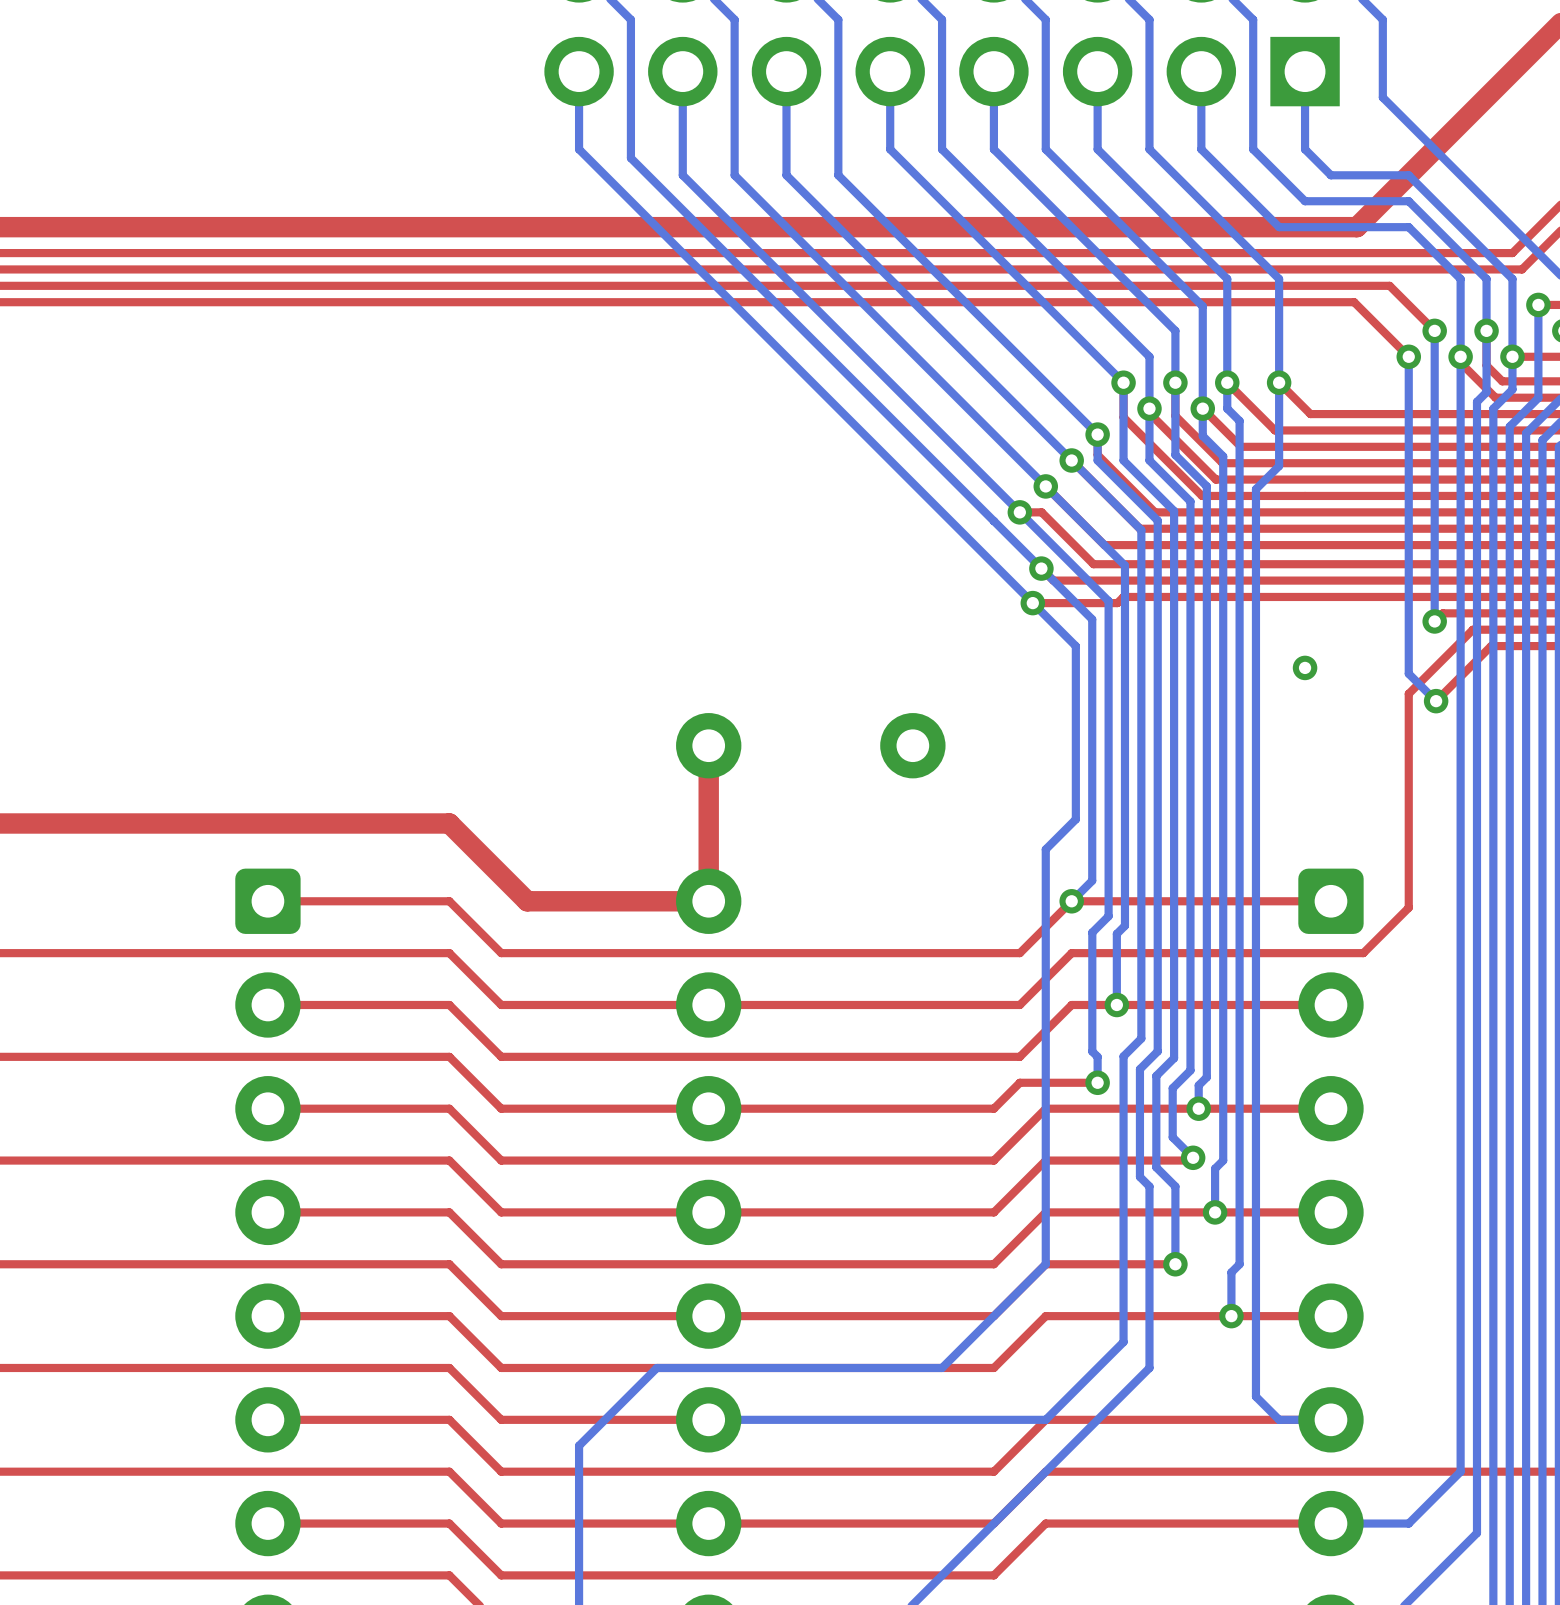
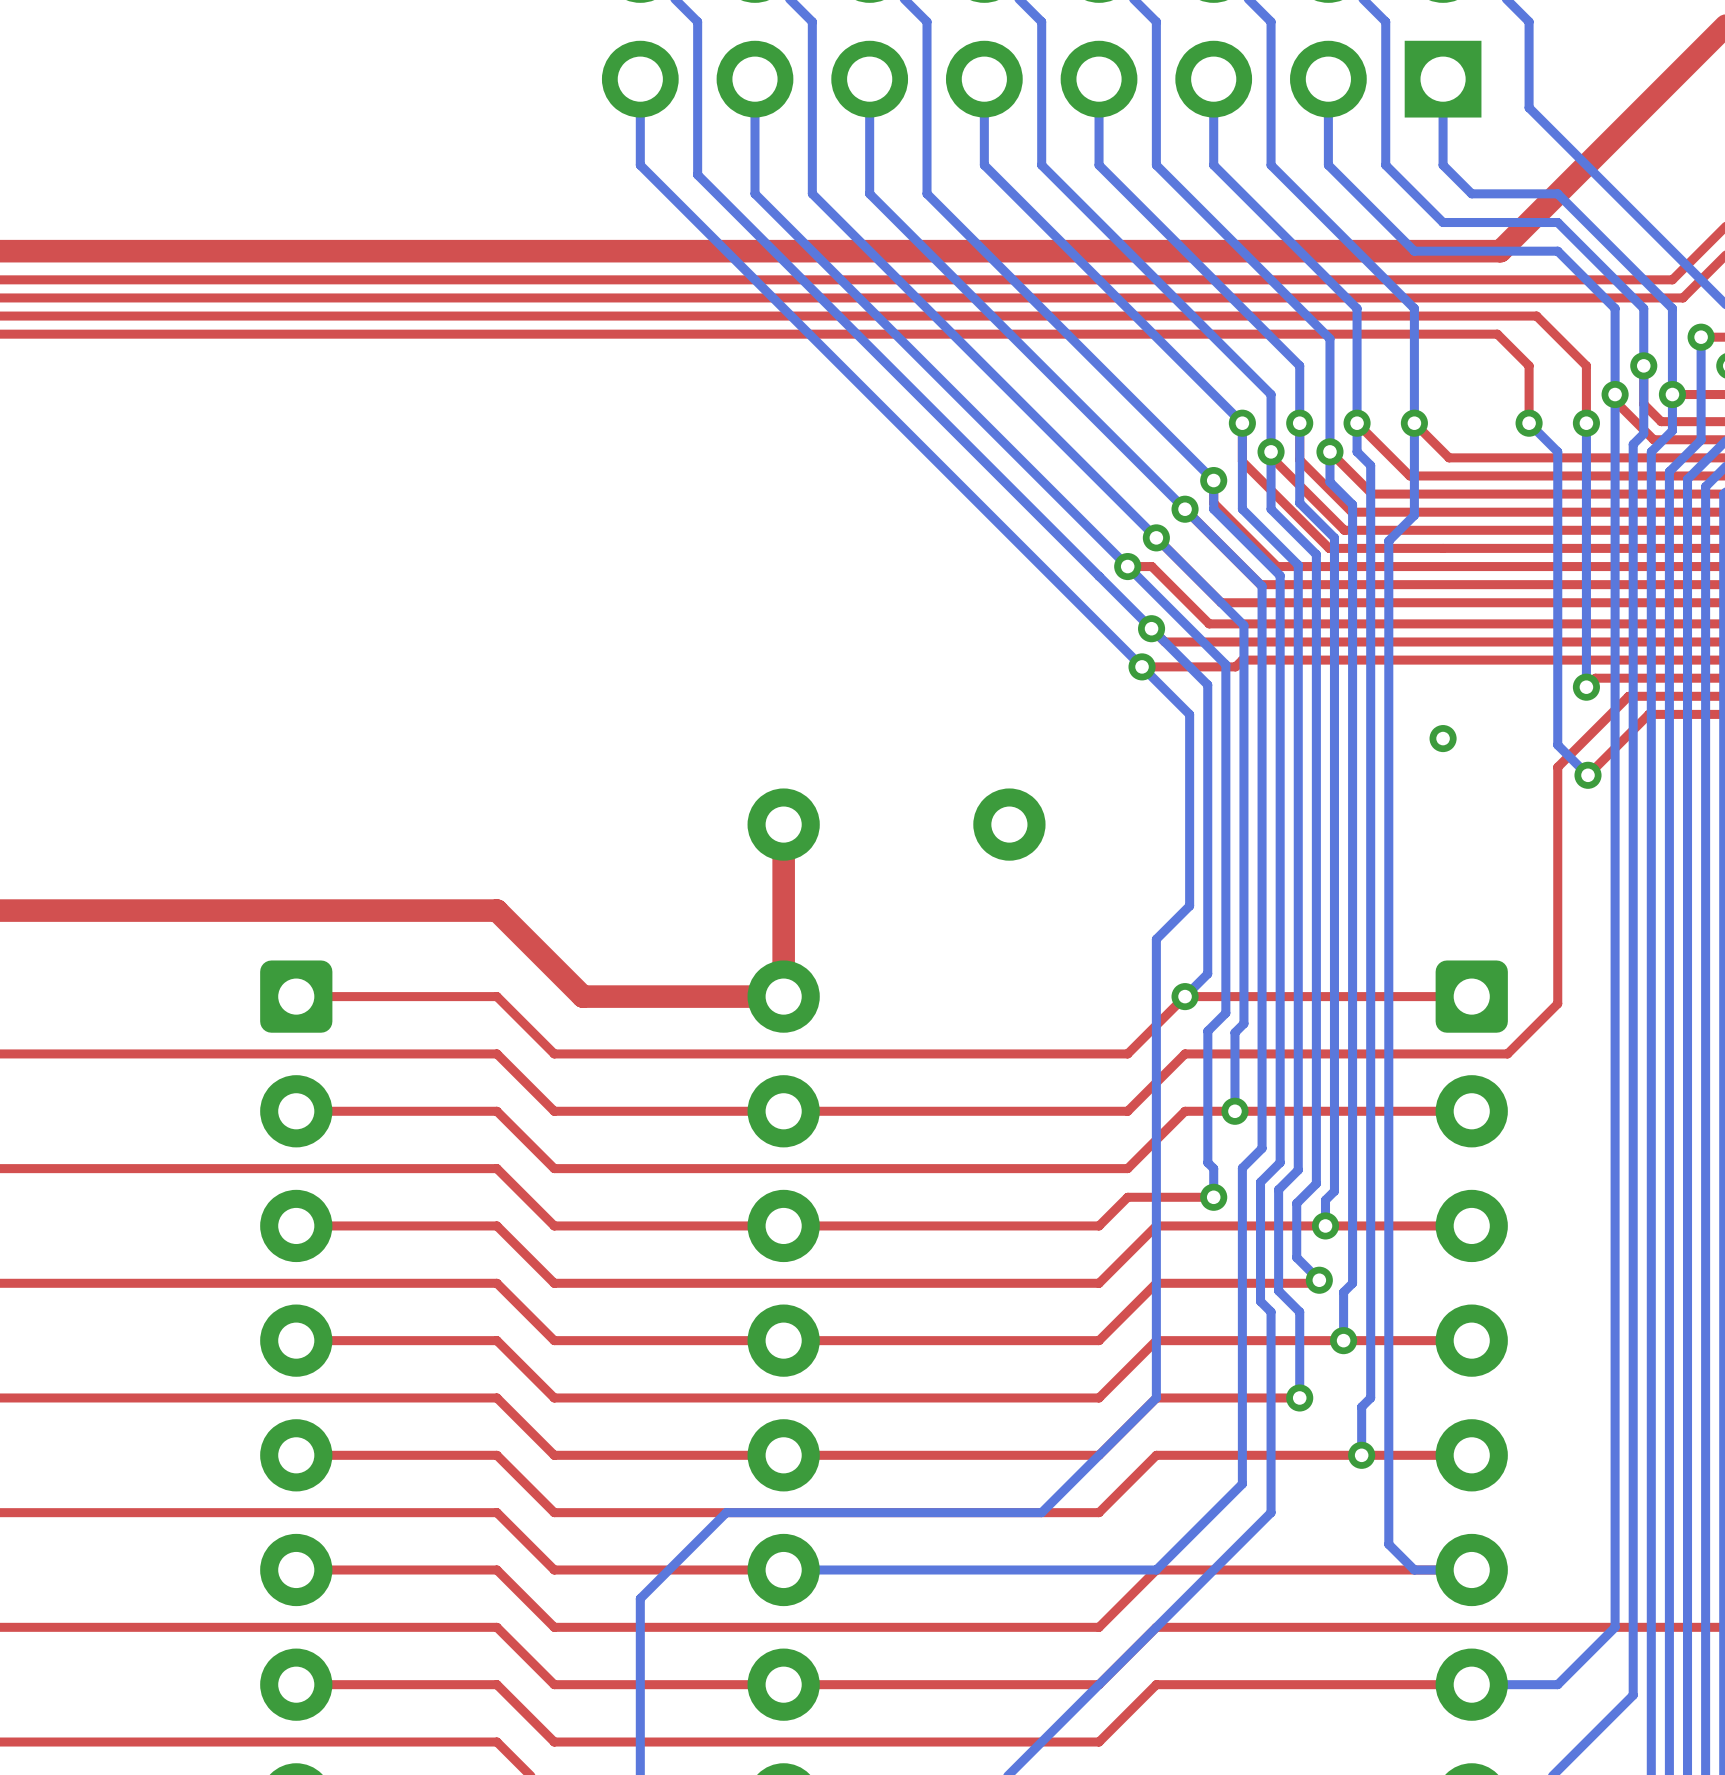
top track: (1382, 330) (1408, 356) -> (1529, 365) (1529, 423)
top track: none -> (1586, 365) (1586, 423)
bottom track: (1434, 330) (1434, 382) -> none
via: (1434, 330) -> none
bottom track: (1408, 356) (1408, 408) -> (1529, 423) (1557, 451)
via: (1408, 356) -> none
via: none -> (1529, 423)
via: none -> (1586, 423)

